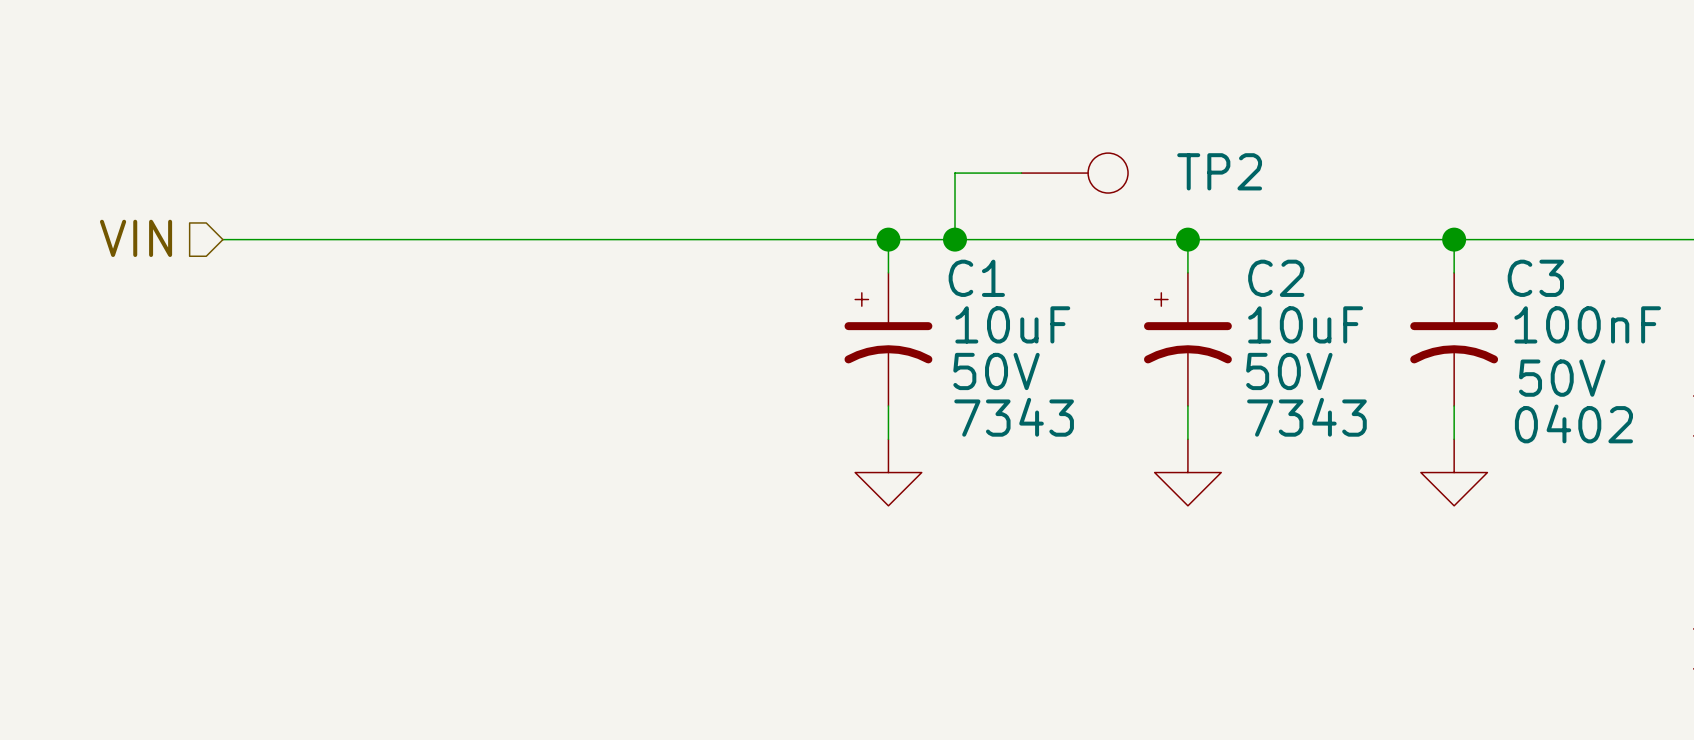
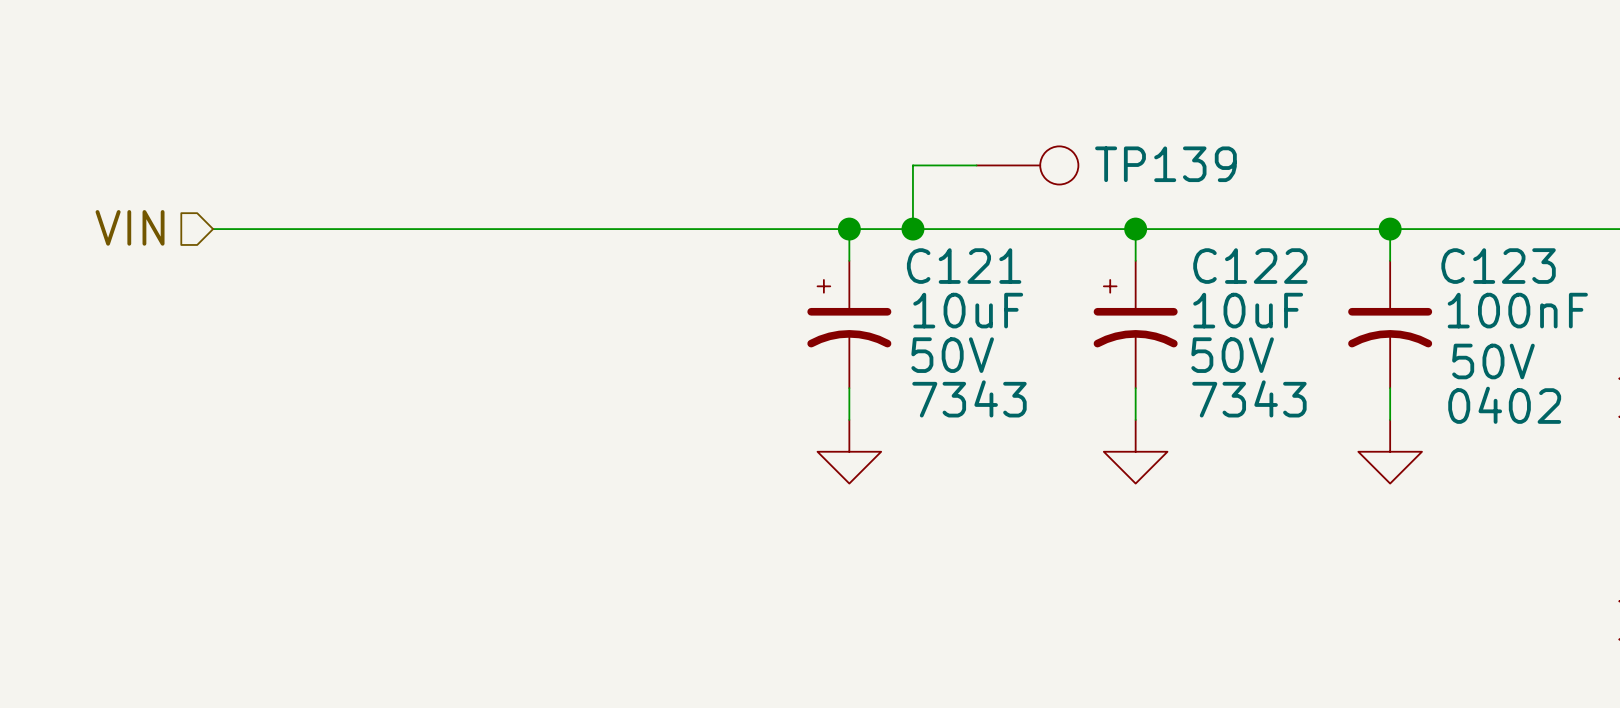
TP2 name: TP2 (1219, 171) -> TP139 (1165, 164)
C1 name: C1 (976, 278) -> C121 (964, 266)
C2 name: C2 (1276, 278) -> C122 (1250, 266)
C3 name: C3 (1535, 278) -> C123 (1498, 266)

